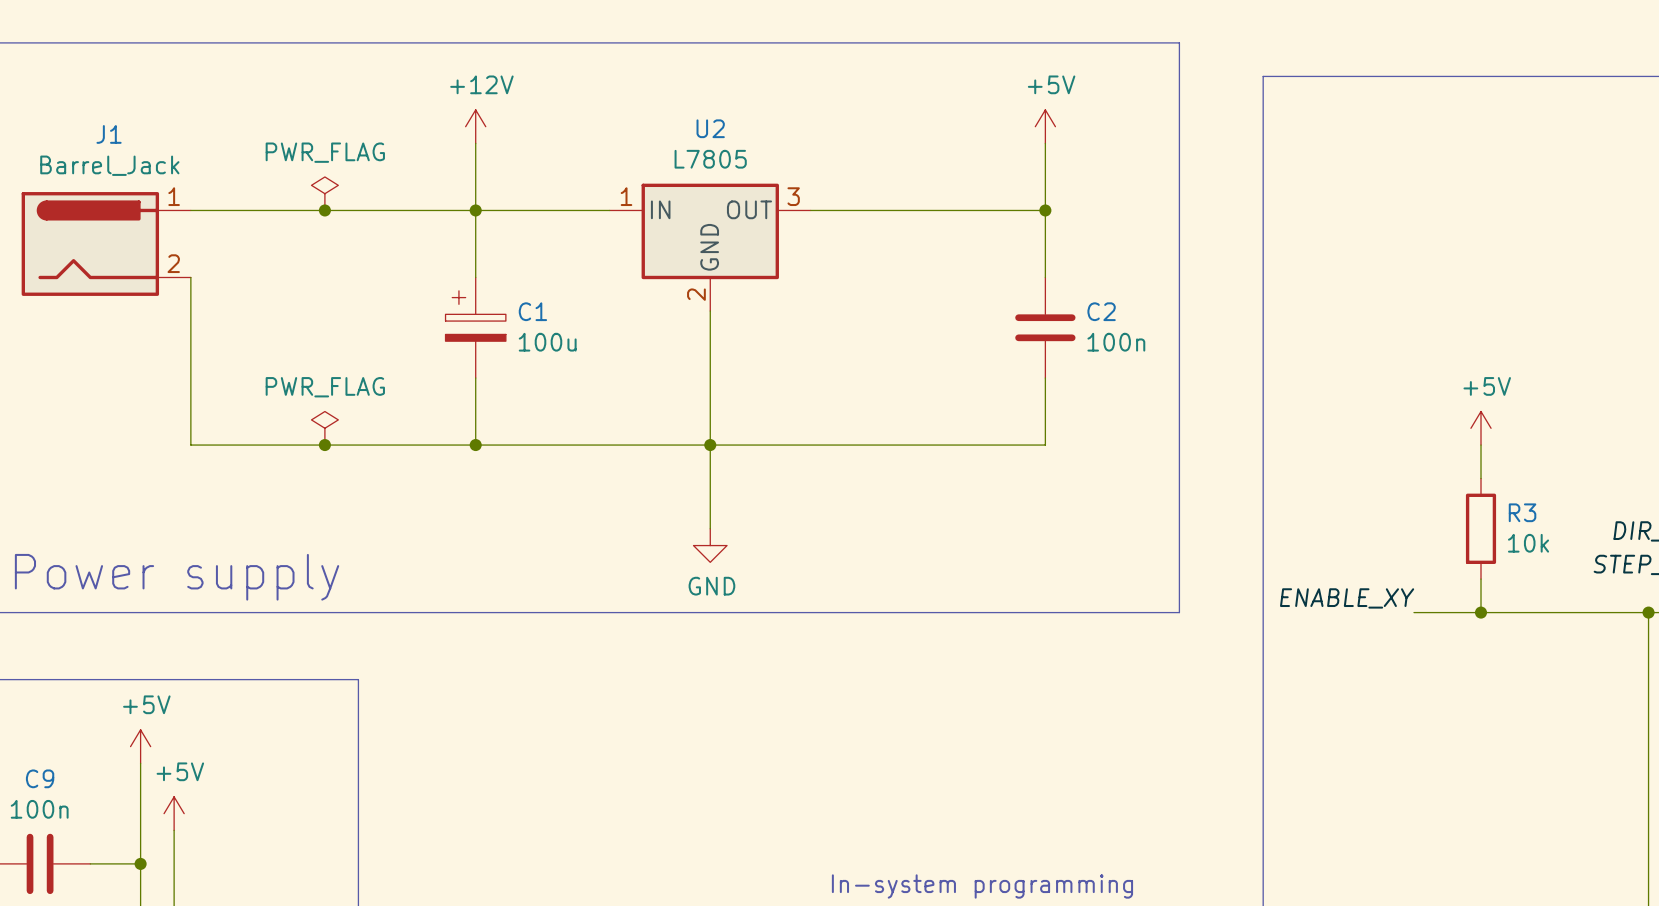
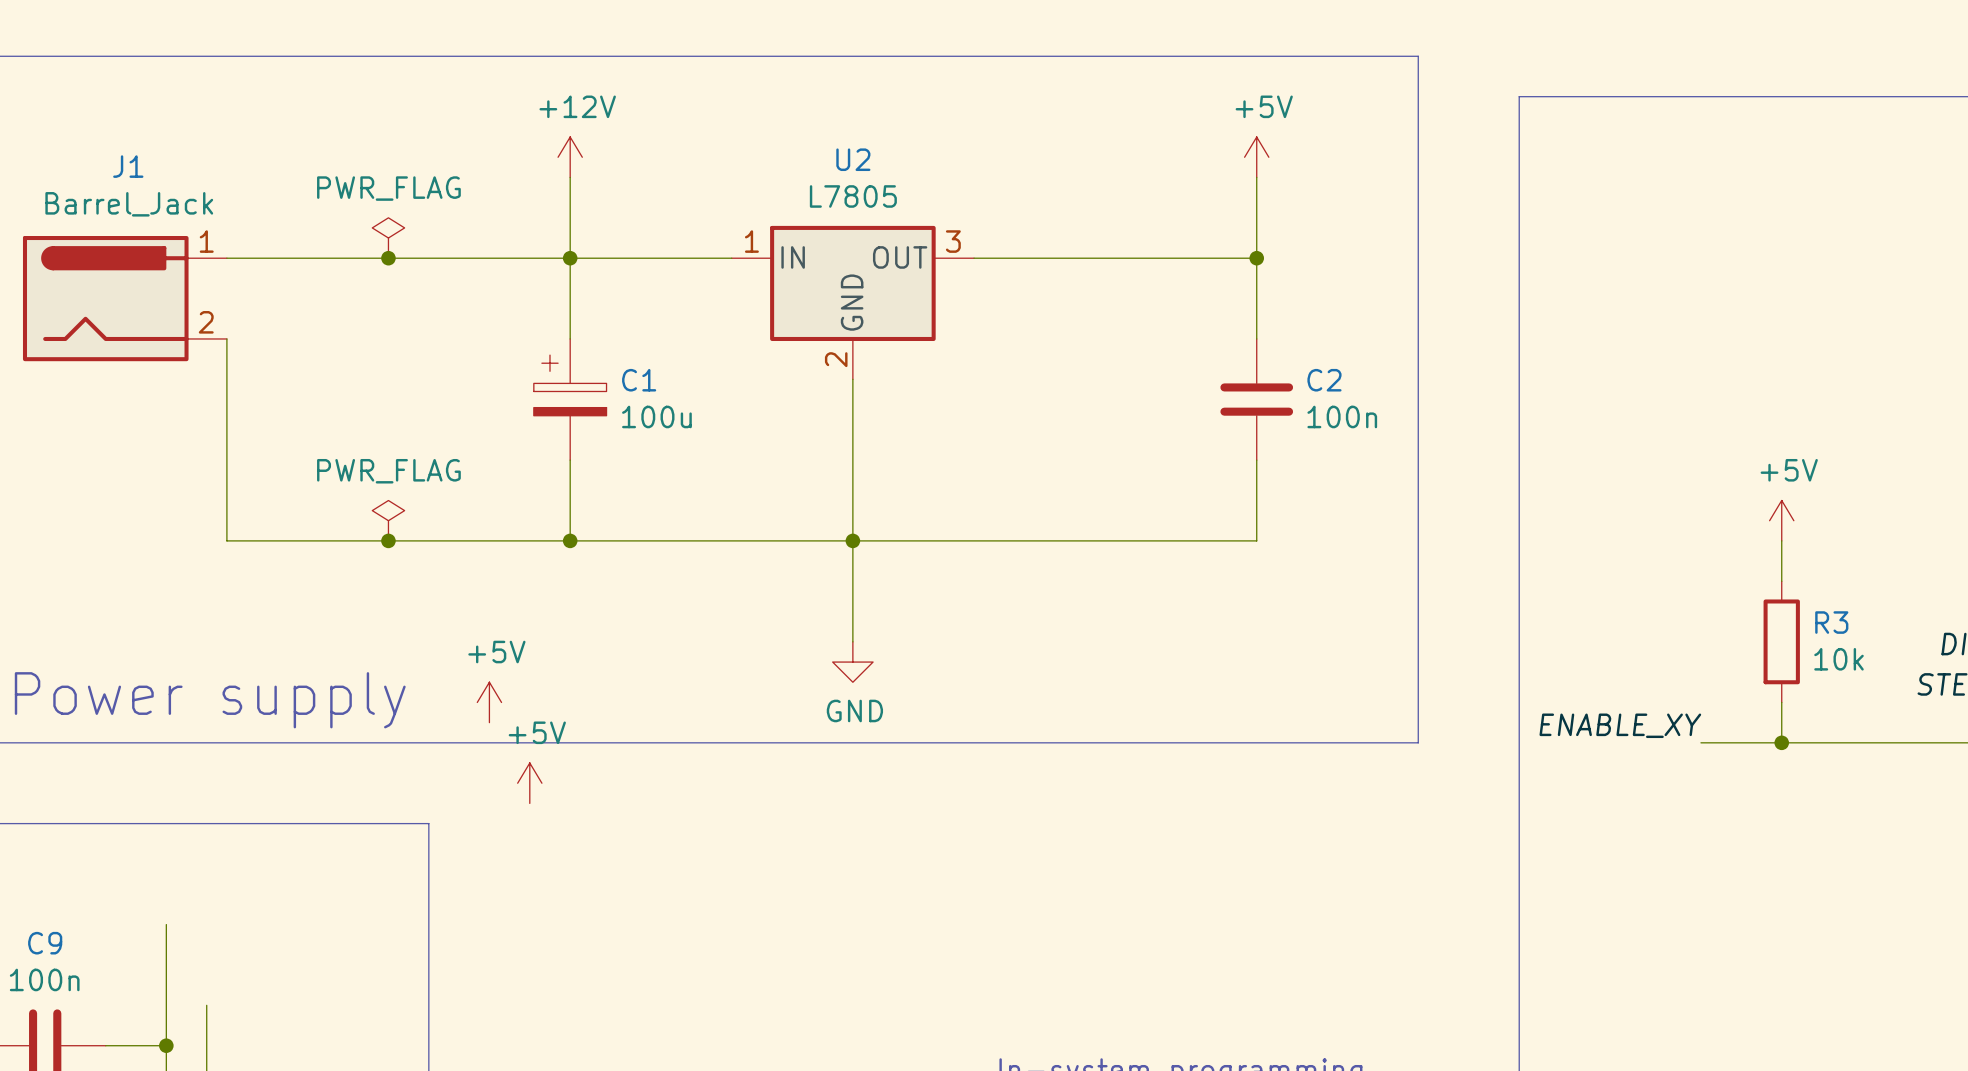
power symbol: none -> +5V (489, 702)
power symbol: none -> +5V (529, 783)
power symbol: +5V (140, 746) -> none
power symbol: +5V (174, 813) -> none

